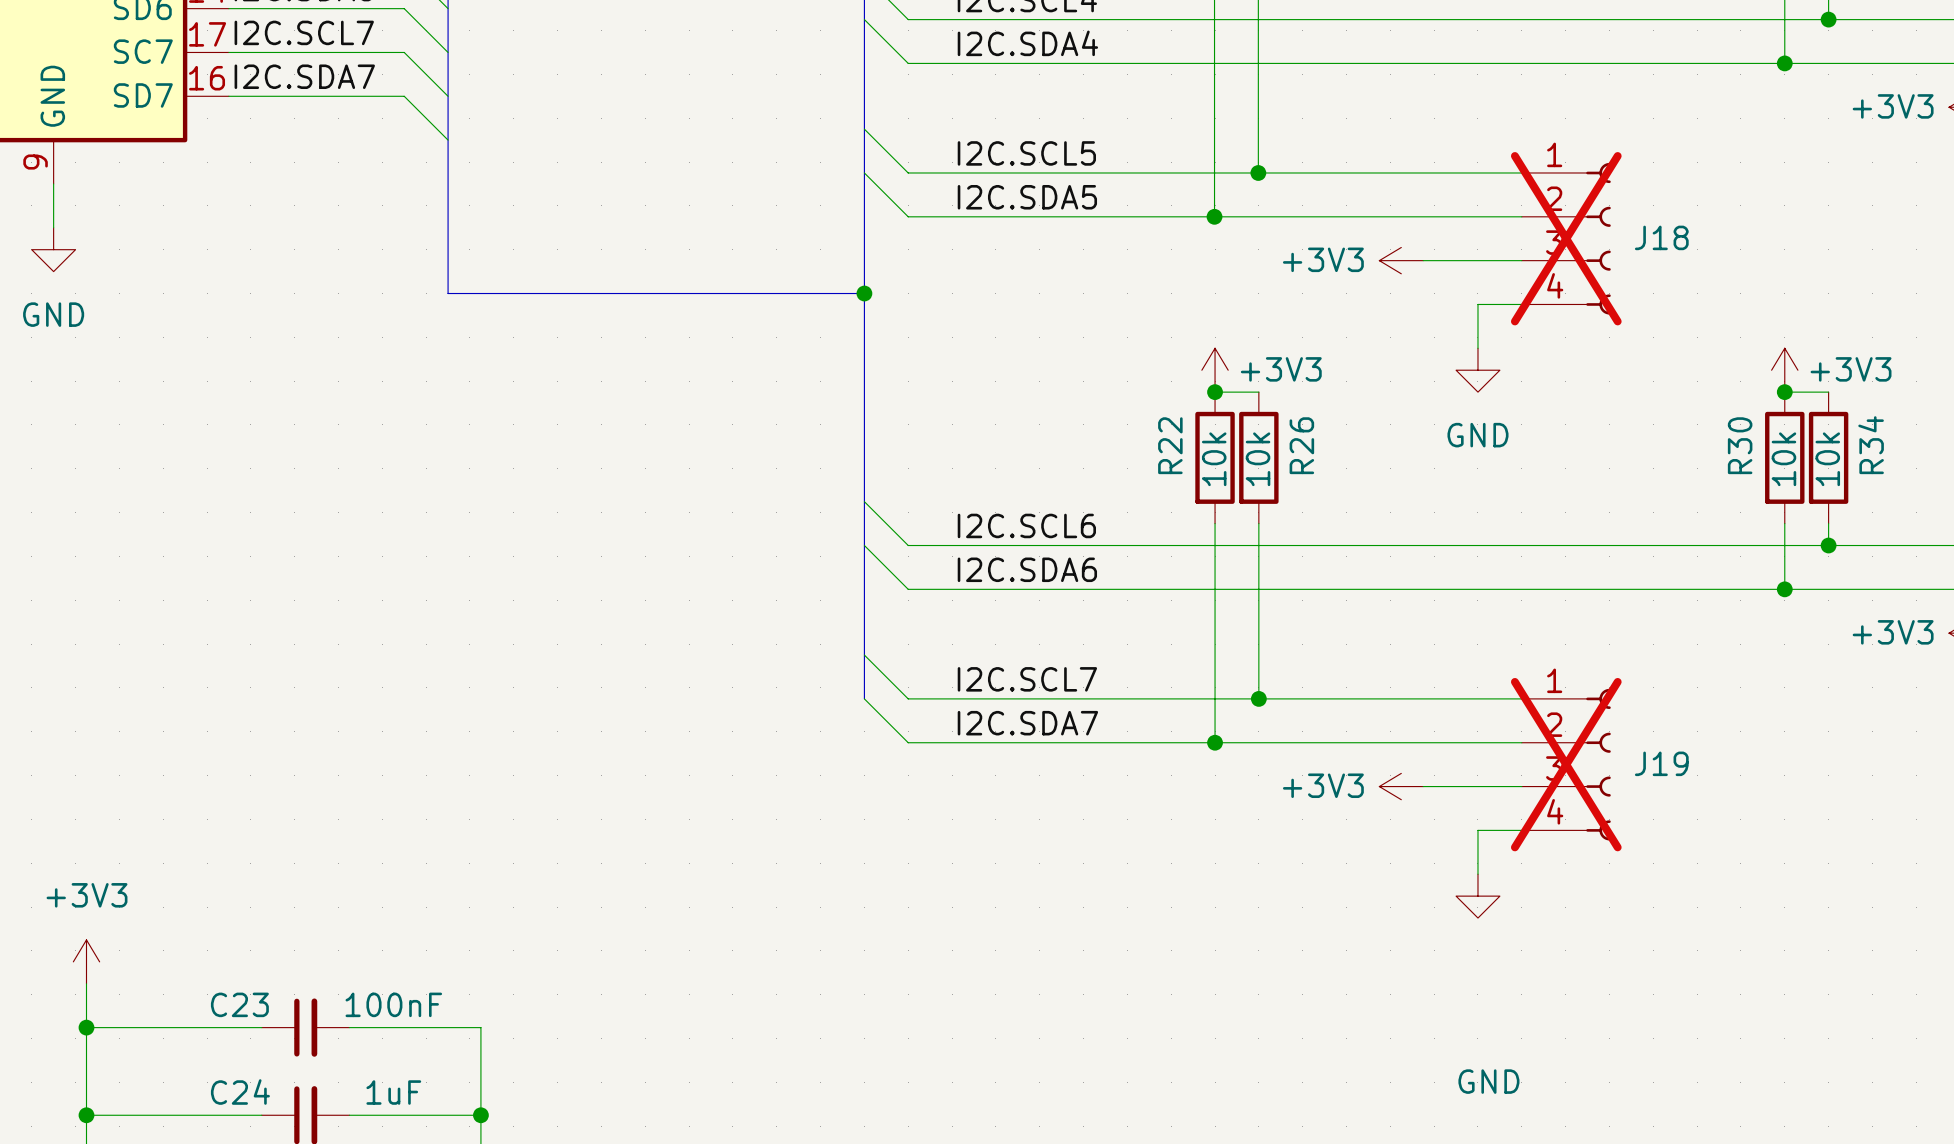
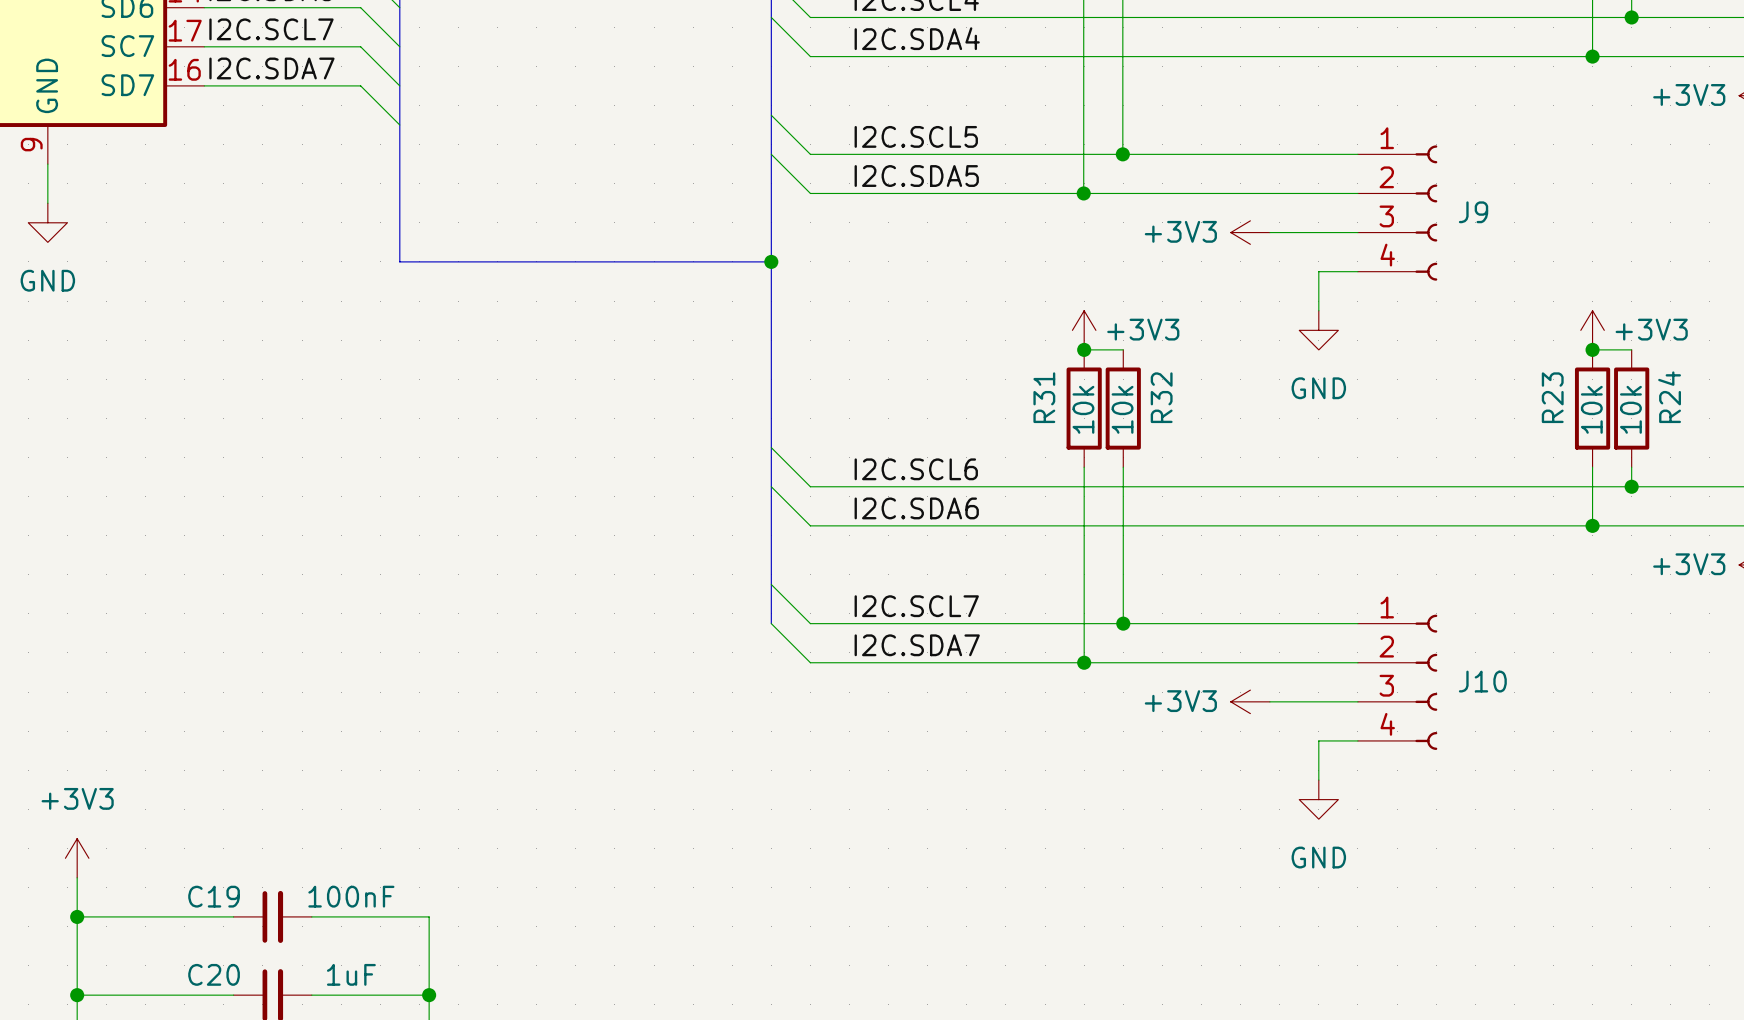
J18 name: J18 (1661, 237) -> J9 (1473, 212)
J18 do-not-place cross: (1566, 238) -> none
R22 name: R22 (1170, 445) -> R31 (1044, 397)
R26 name: R26 (1301, 445) -> R32 (1161, 397)
R30 name: R30 (1740, 445) -> R23 (1552, 397)
R34 name: R34 (1871, 445) -> R24 (1669, 397)
J19 name: J19 (1661, 763) -> J10 (1482, 681)
J19 do-not-place cross: (1566, 764) -> none
C23 name: C23 (239, 1004) -> C19 (214, 896)
power symbol text position: GND (1488, 1081) -> GND (1318, 857)
C24 name: C24 (240, 1092) -> C20 (214, 974)

